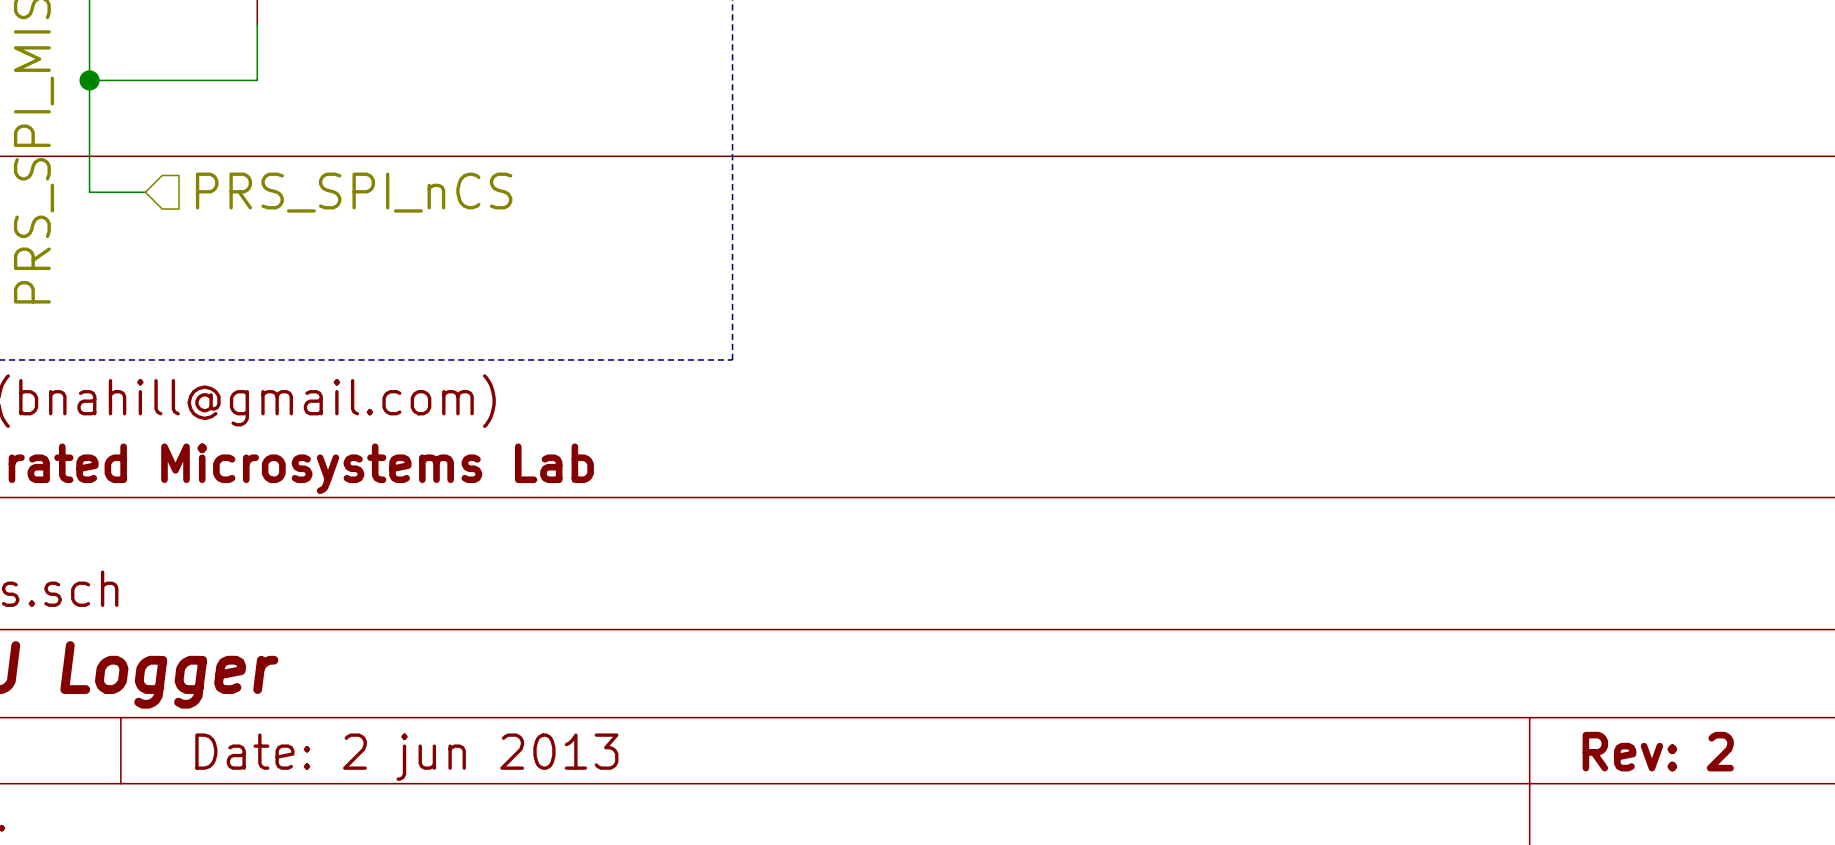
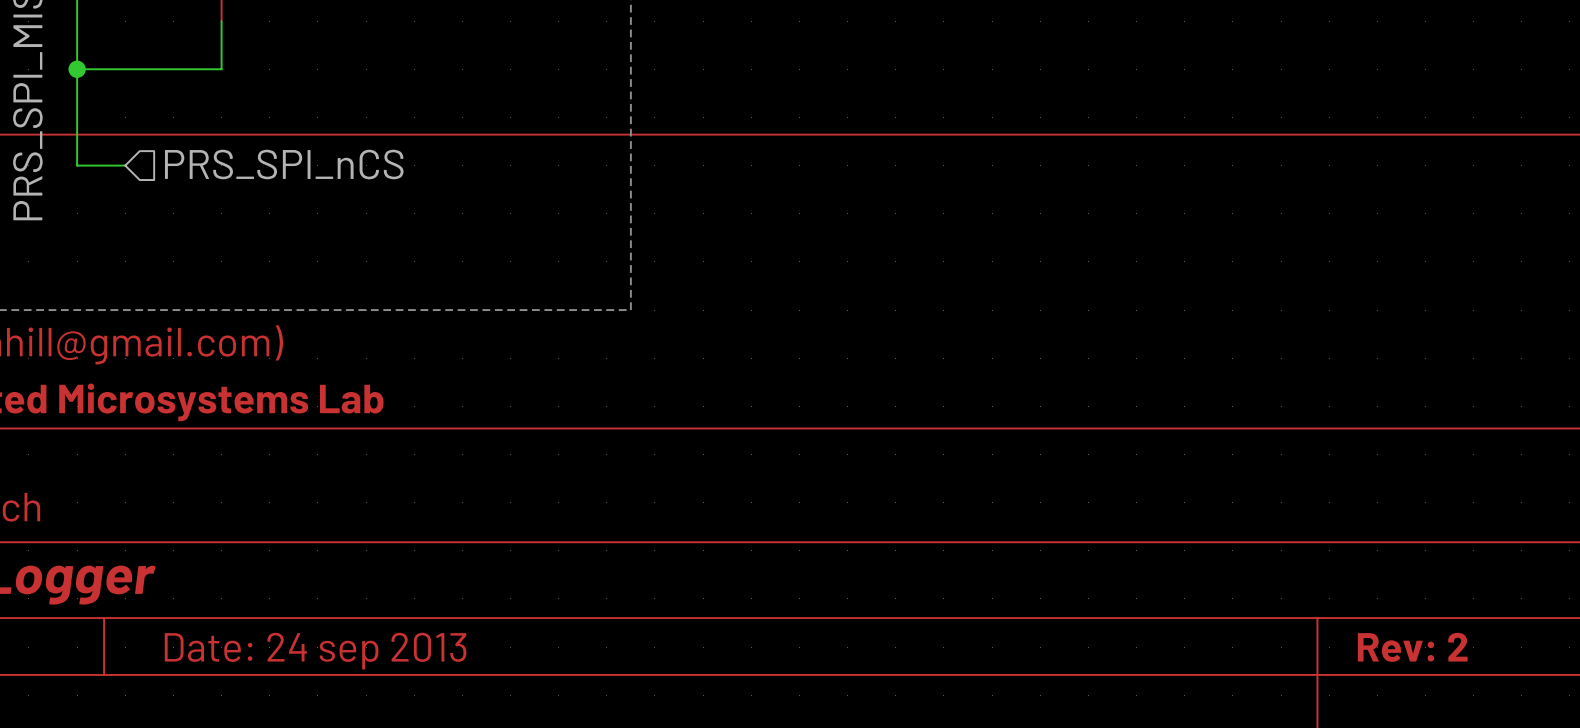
title block: Date: 2 jun 2013 (406, 757) -> Date: 24 sep 2013 (315, 651)

